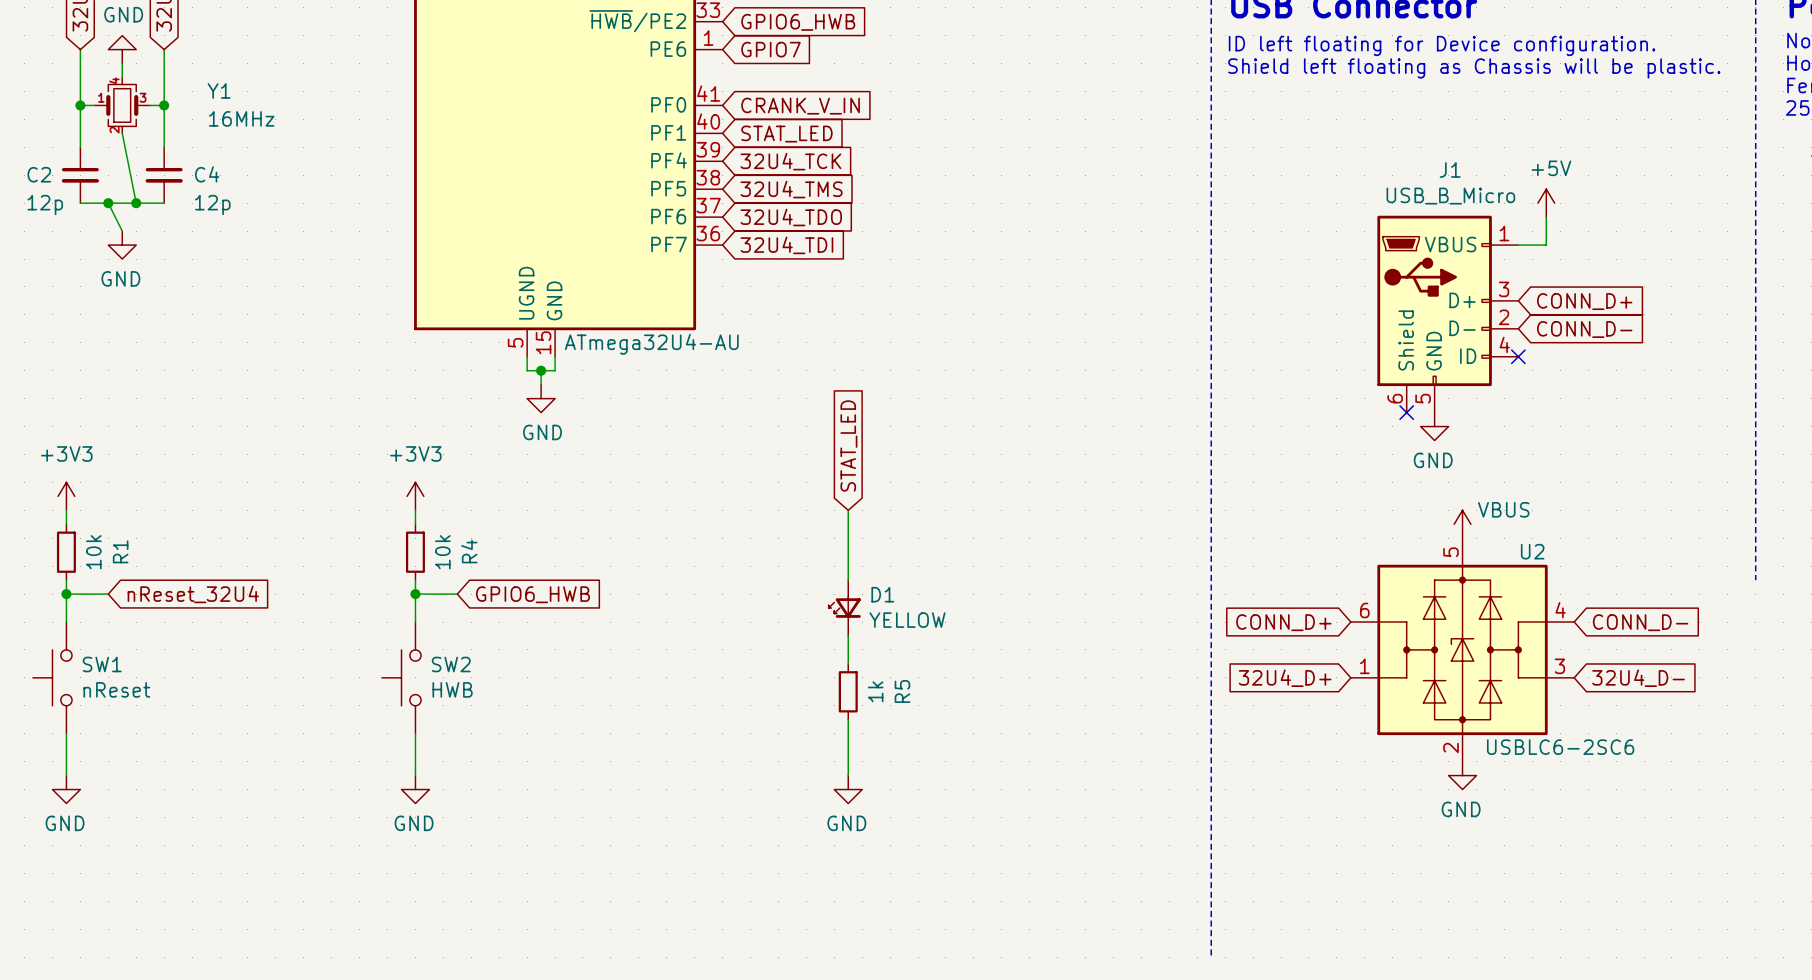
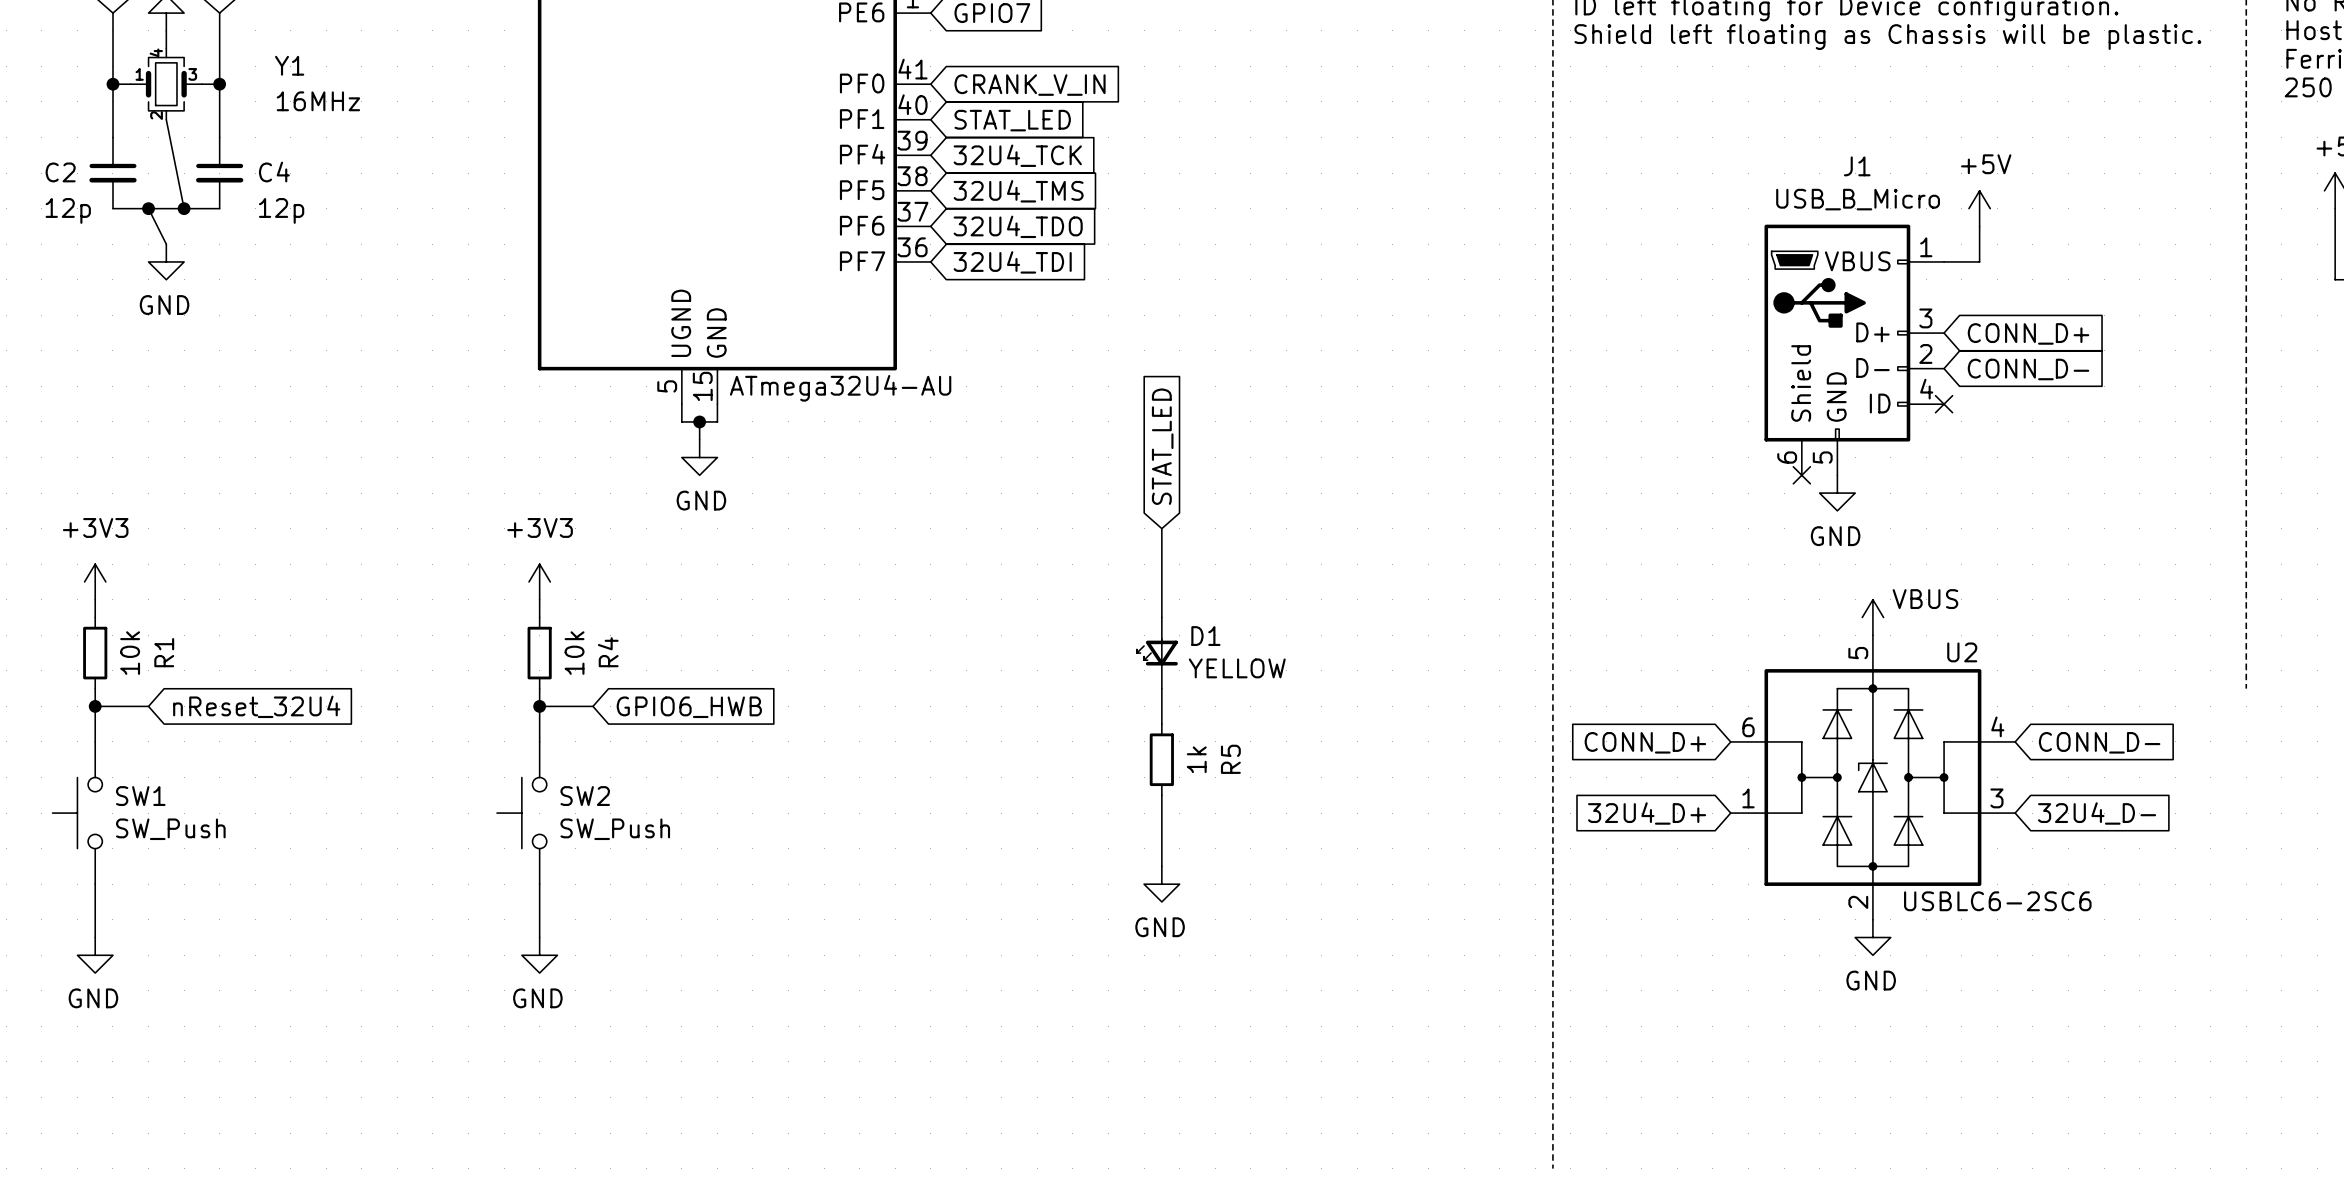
global label position: STAT_LED (848, 445) -> STAT_LED (1162, 446)
wire: (848, 510) (848, 580) -> (1161, 528) (1161, 617)
D1 position: (844, 608) -> (1157, 653)
wire: (848, 635) (848, 663) -> (1161, 688) (1161, 724)
SW1 value: nReset (116, 689) -> SW_Push (170, 829)
SW2 value: HWB (452, 689) -> SW_Push (615, 829)
R5 position: (848, 691) -> (1161, 759)
wire: (848, 719) (848, 775) -> (1161, 795) (1161, 866)
power symbol position: GND (848, 789) -> GND (1161, 884)

